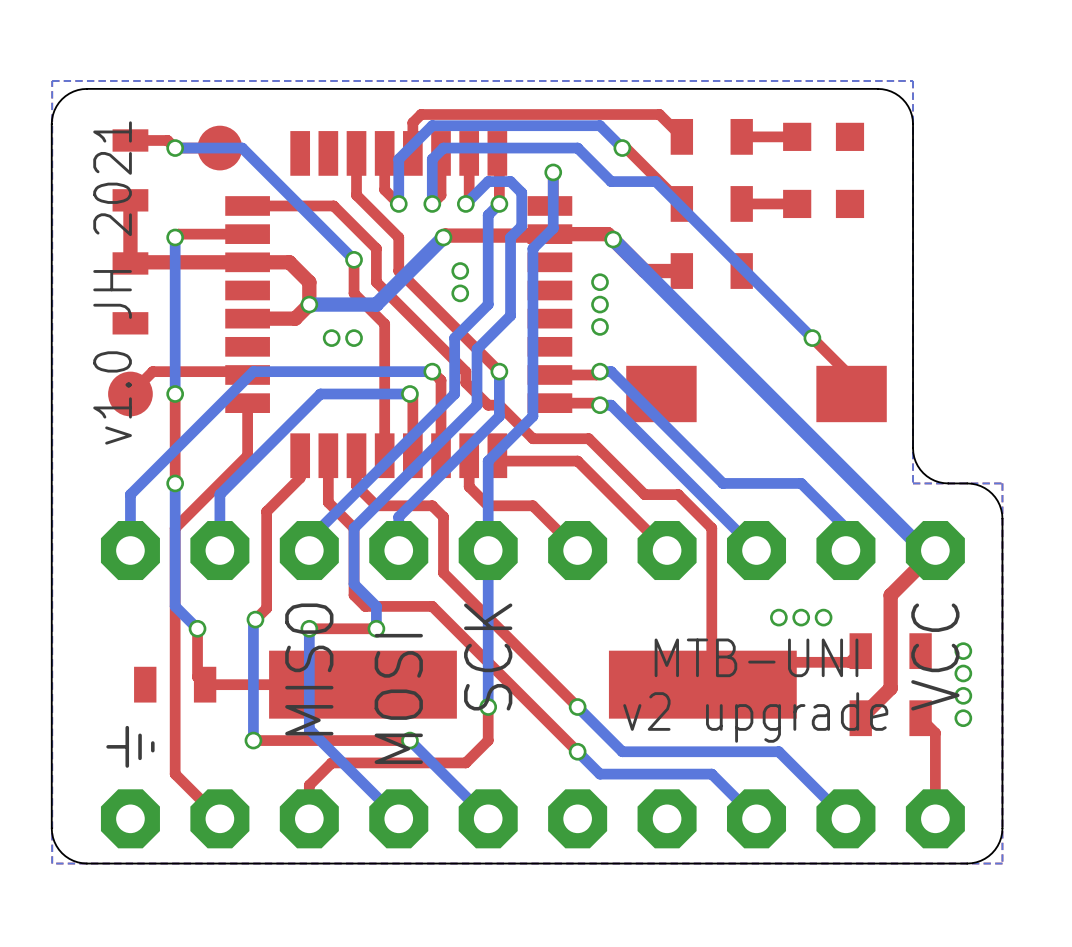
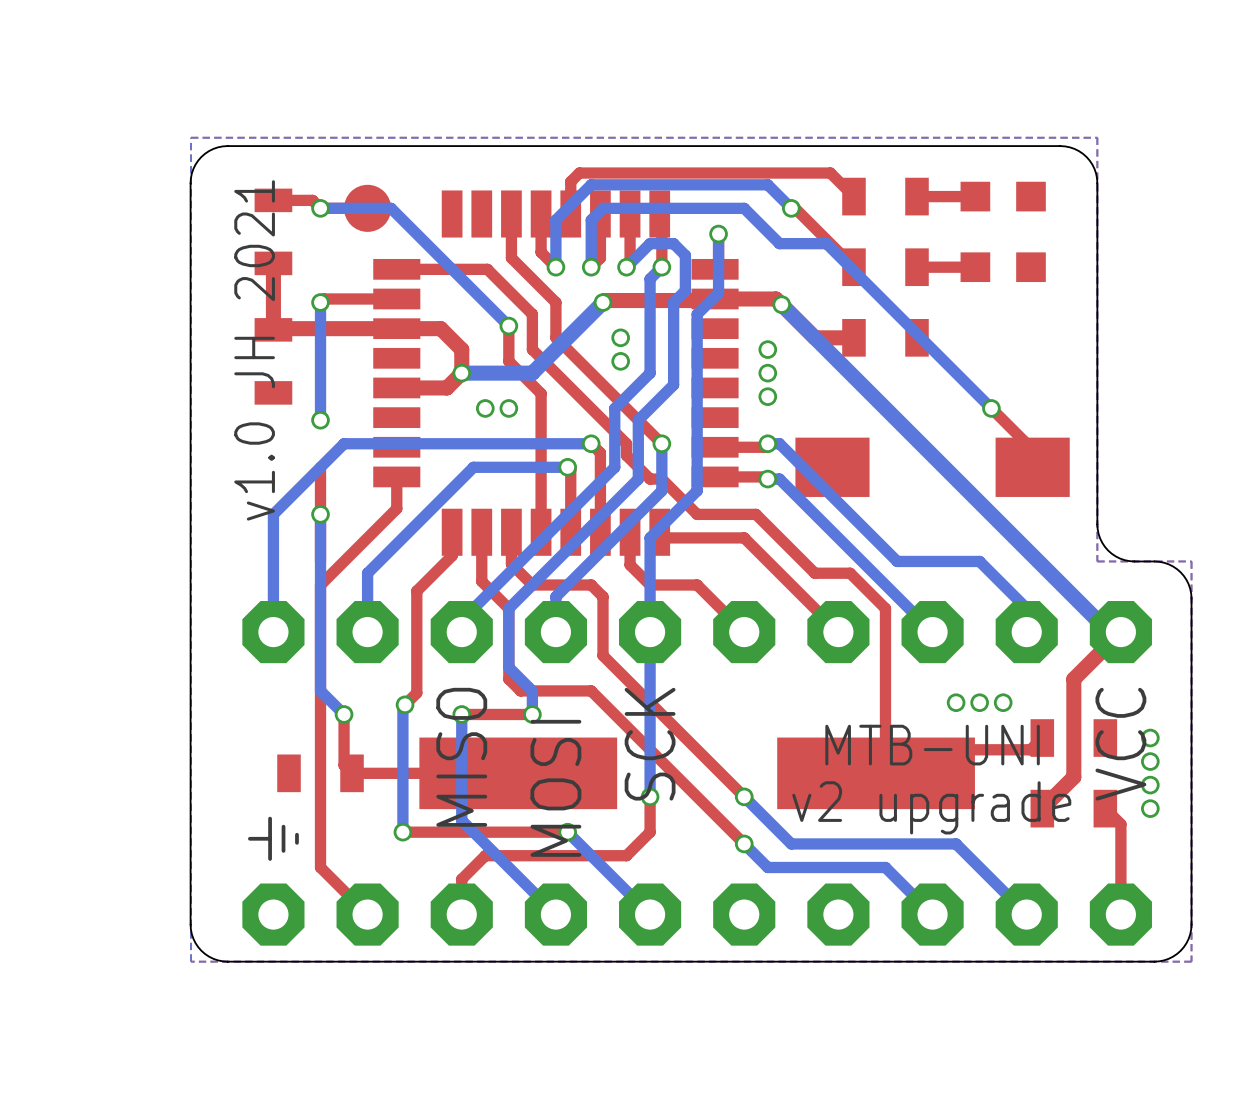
bottom track: (175, 349) (175, 394) -> (320, 514) (320, 561)
via: none -> (320, 420)
bottom track: (253, 371) (130, 494) -> (402, 443) (344, 443) (273, 514) (273, 573)
top track: (247, 374) (244, 371) (152, 371) (130, 394) -> none
part: (130, 394) -> none
via: (175, 394) -> none
top track: (247, 433) (247, 455) (175, 528) -> (396, 508) (320, 585) (320, 608)
via: none -> (320, 514)
via: (175, 483) -> none

